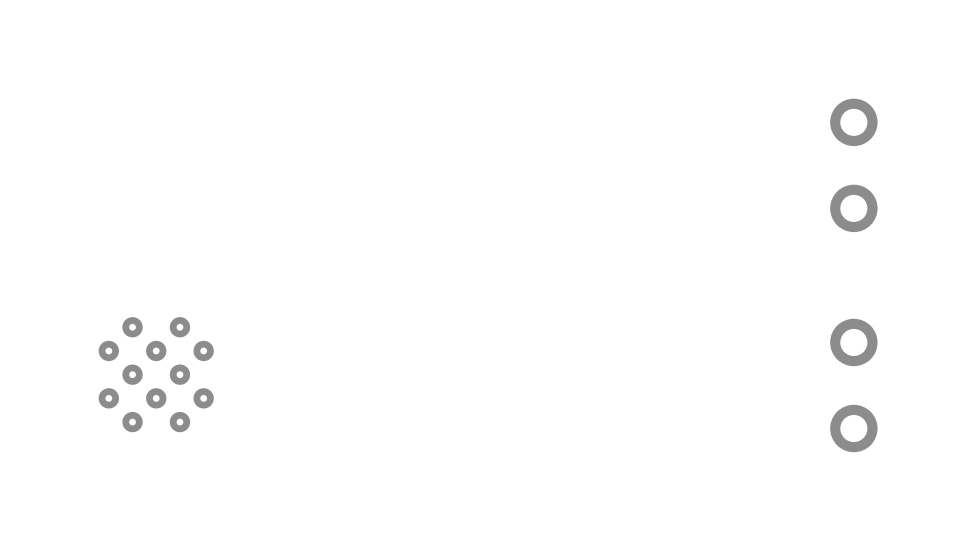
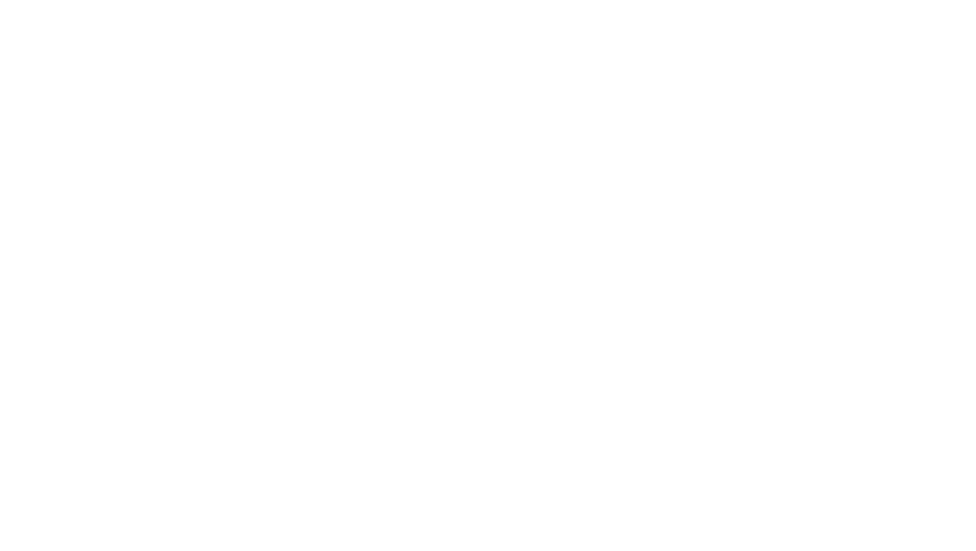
part: (853, 165) -> none
part: (156, 374) -> none
part: (853, 385) -> none

